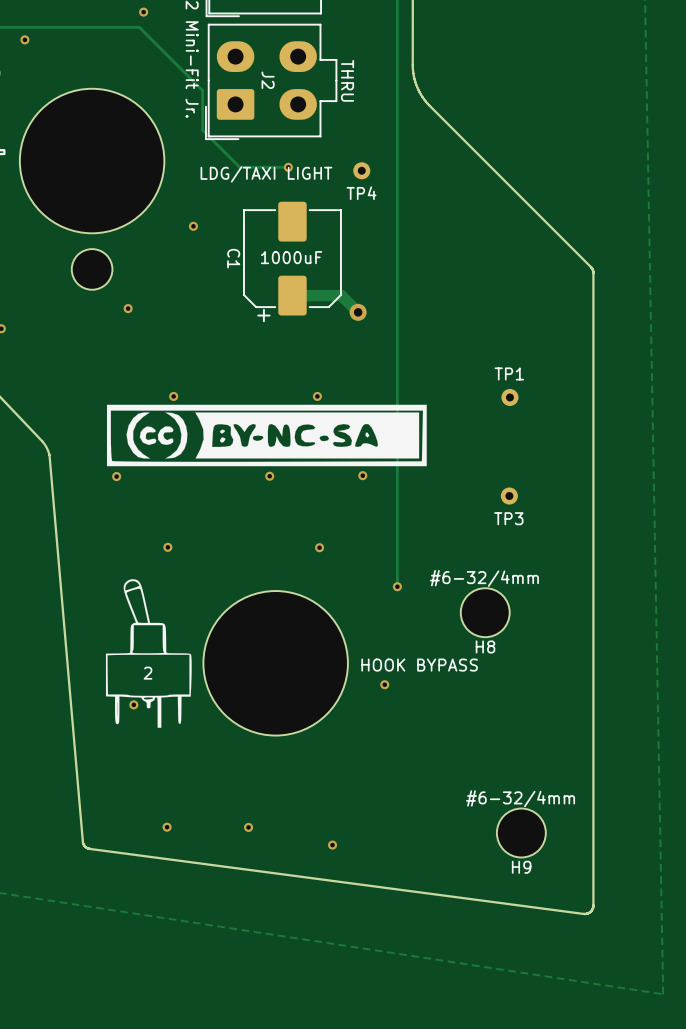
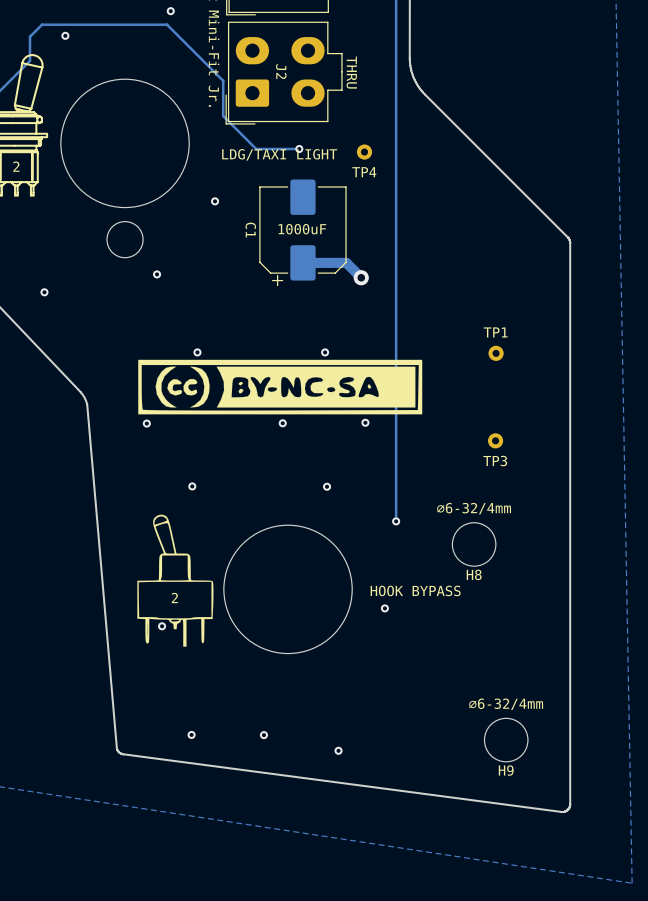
H8 text: none -> ⌀6-32/4mm (474, 508)
H8 text: #6-32/4mm (484, 578) -> none
H9 text: none -> ⌀6-32/4mm (506, 704)
H9 text: #6-32/4mm (520, 798) -> none

